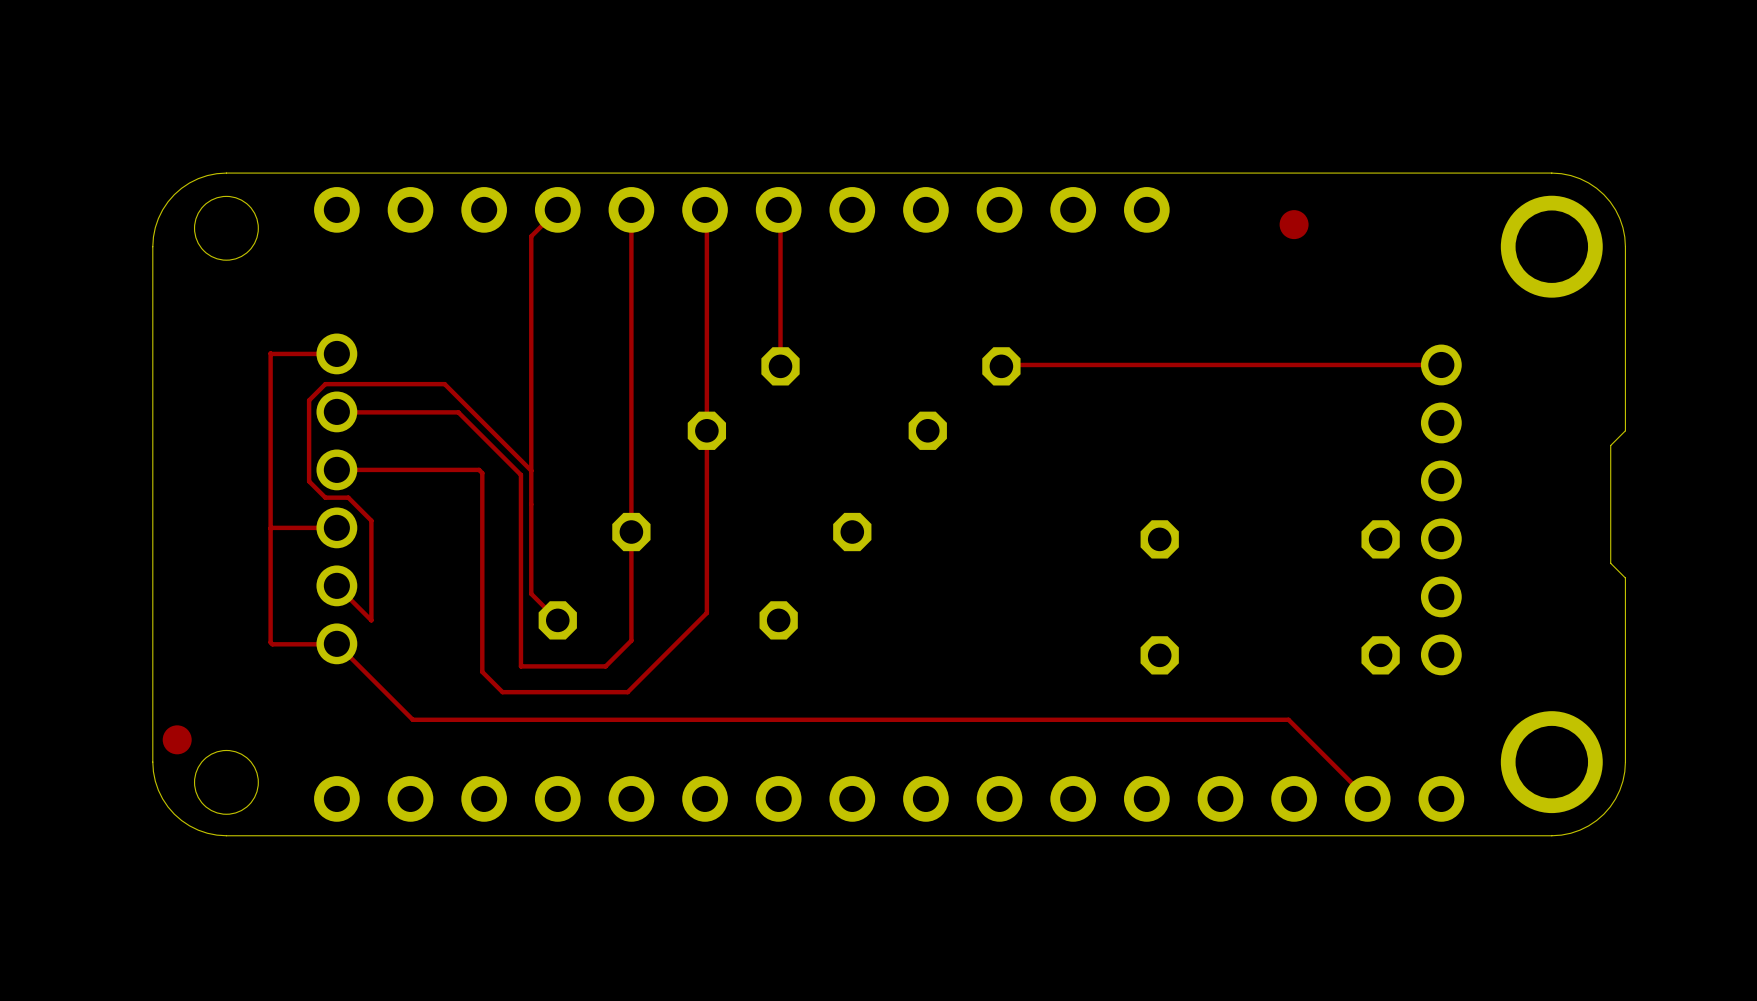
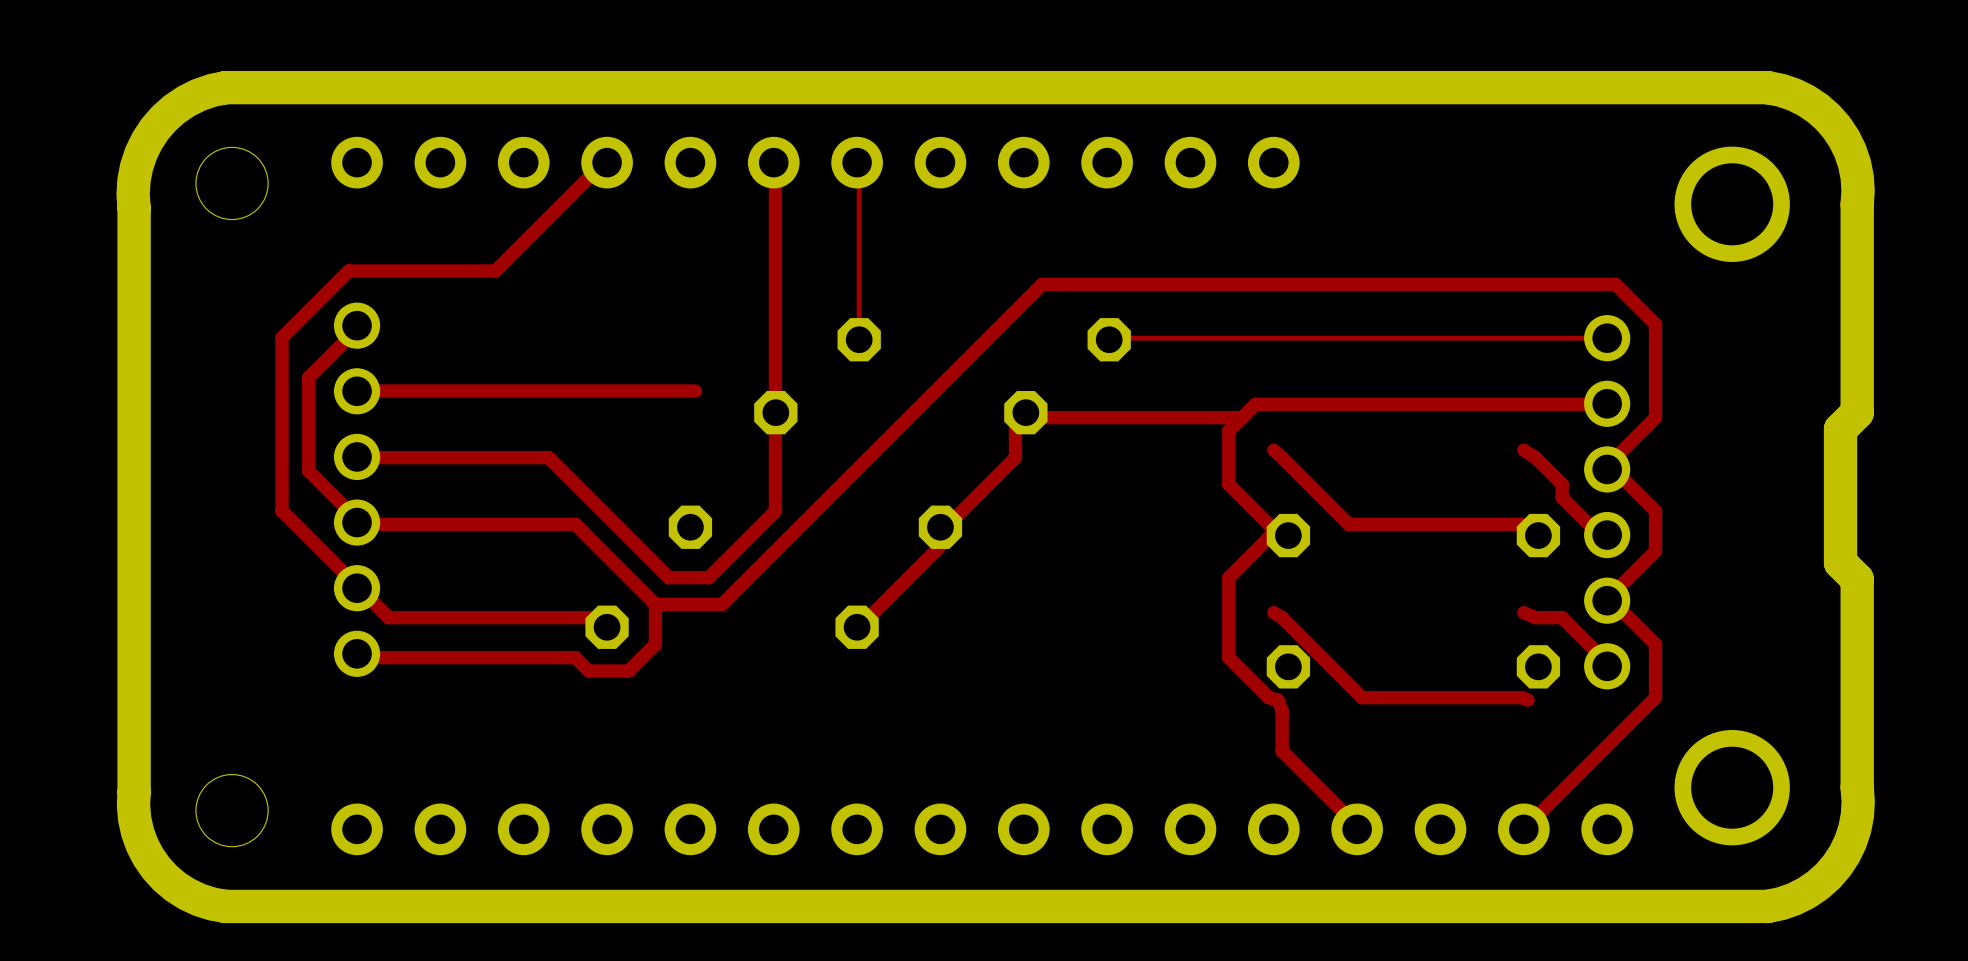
board edge: (1551, 173) (226, 173) (198, 178) (181, 188) (168, 201) (155, 227) (152, 246) (152, 762) (158, 790) (168, 806) (181, 820) (207, 833) (226, 835) (1551, 835) (1579, 830) (1596, 820) (1610, 806) (1619, 790) (1624, 771) (1625, 578) (1610, 563) (1610, 445) (1625, 430) (1625, 246) (1619, 218) (1603, 194) (1579, 178) (1551, 173) -> (1767, 87) (1793, 94) (1806, 100) (1827, 117) (1844, 138) (1850, 150) (1854, 163) (1858, 190) (1857, 412) (1840, 429) (1840, 562) (1857, 579) (1857, 815) (1850, 841) (1836, 865) (1817, 885) (1794, 899) (1767, 906) (225, 906) (199, 899) (175, 886) (156, 868) (142, 844) (137, 832) (133, 805) (133, 180) (141, 153) (154, 129) (174, 109) (198, 95) (225, 87) (1767, 87)
top track: (557, 209) (531, 236) (531, 593) (557, 620) -> (282, 510) (357, 588) (388, 617) (602, 617) (607, 627)
top track: (631, 209) (631, 640) (605, 666) (520, 666) (520, 474) (458, 412) (336, 411) -> (695, 390) (357, 391)
top track: (706, 211) (706, 613) (627, 692) (502, 692) (482, 671) (482, 473) (479, 469) (336, 469) -> (775, 164) (775, 510) (708, 577) (668, 577) (548, 457) (357, 456)
part: (1294, 224) -> none
top track: (336, 353) (270, 353) (270, 364) -> (607, 162) (602, 164) (495, 270) (348, 270) (282, 337)
top track: none -> (357, 325) (348, 337) (308, 377) (308, 470) (348, 510) (357, 522) (362, 524) (575, 524) (655, 604)
top track width: thin (270, 364) (270, 517) -> thick (282, 337) (282, 510)
top track: none -> (1607, 403) (1255, 404) (1228, 430) (1228, 484) (1273, 531) (1228, 577) (1228, 657) (1268, 697) (1277, 700) (1282, 711) (1282, 751) (1348, 817) (1357, 829)
top track: none -> (1242, 417) (1028, 417) (1025, 412) (1015, 417) (1015, 457) (948, 524) (940, 527) (948, 537) (857, 627)
top track: none -> (1273, 450) (1348, 524) (1522, 524) (1523, 531)
top track: none -> (1523, 450) (1535, 457) (1562, 484) (1562, 497) (1602, 537) (1607, 535)
top track: (531, 470) (444, 384) (325, 384) (309, 400) (309, 481) (325, 497) (348, 497) (371, 520) (371, 620) (336, 585) -> none
top track: (270, 517) (270, 642) (272, 644) (336, 643) (412, 719) (1288, 719) (1367, 798) -> (655, 604) (722, 604) (1042, 284) (1615, 284) (1655, 324) (1655, 417) (1615, 457) (1607, 469) (1615, 470) (1655, 510) (1655, 551) (1607, 600) (1615, 604) (1655, 644) (1655, 697) (1523, 829)
top track: (336, 527) (270, 528) -> none
top track: none -> (655, 604) (655, 644) (628, 671) (588, 671) (575, 657) (362, 657) (357, 653)
top track: none -> (1273, 612) (1282, 617) (1362, 697) (1522, 697) (1527, 700)
top track: none -> (1523, 612) (1535, 617) (1562, 617) (1602, 657) (1607, 666)
part: (177, 739) -> none

